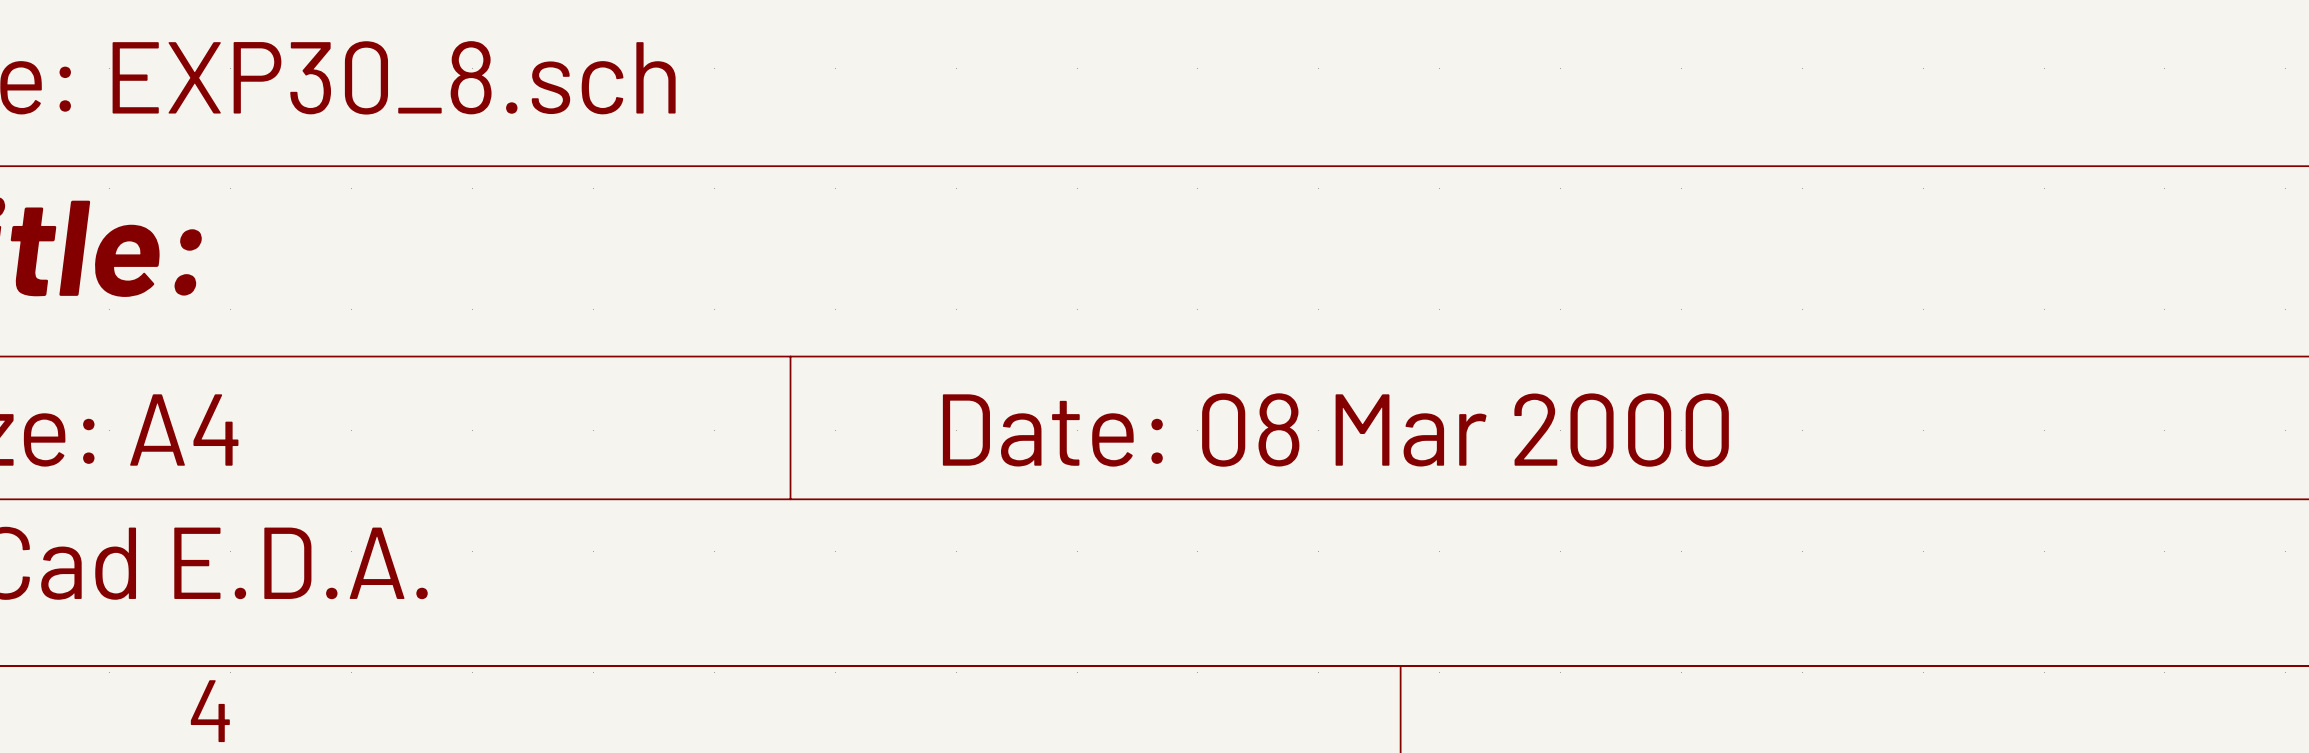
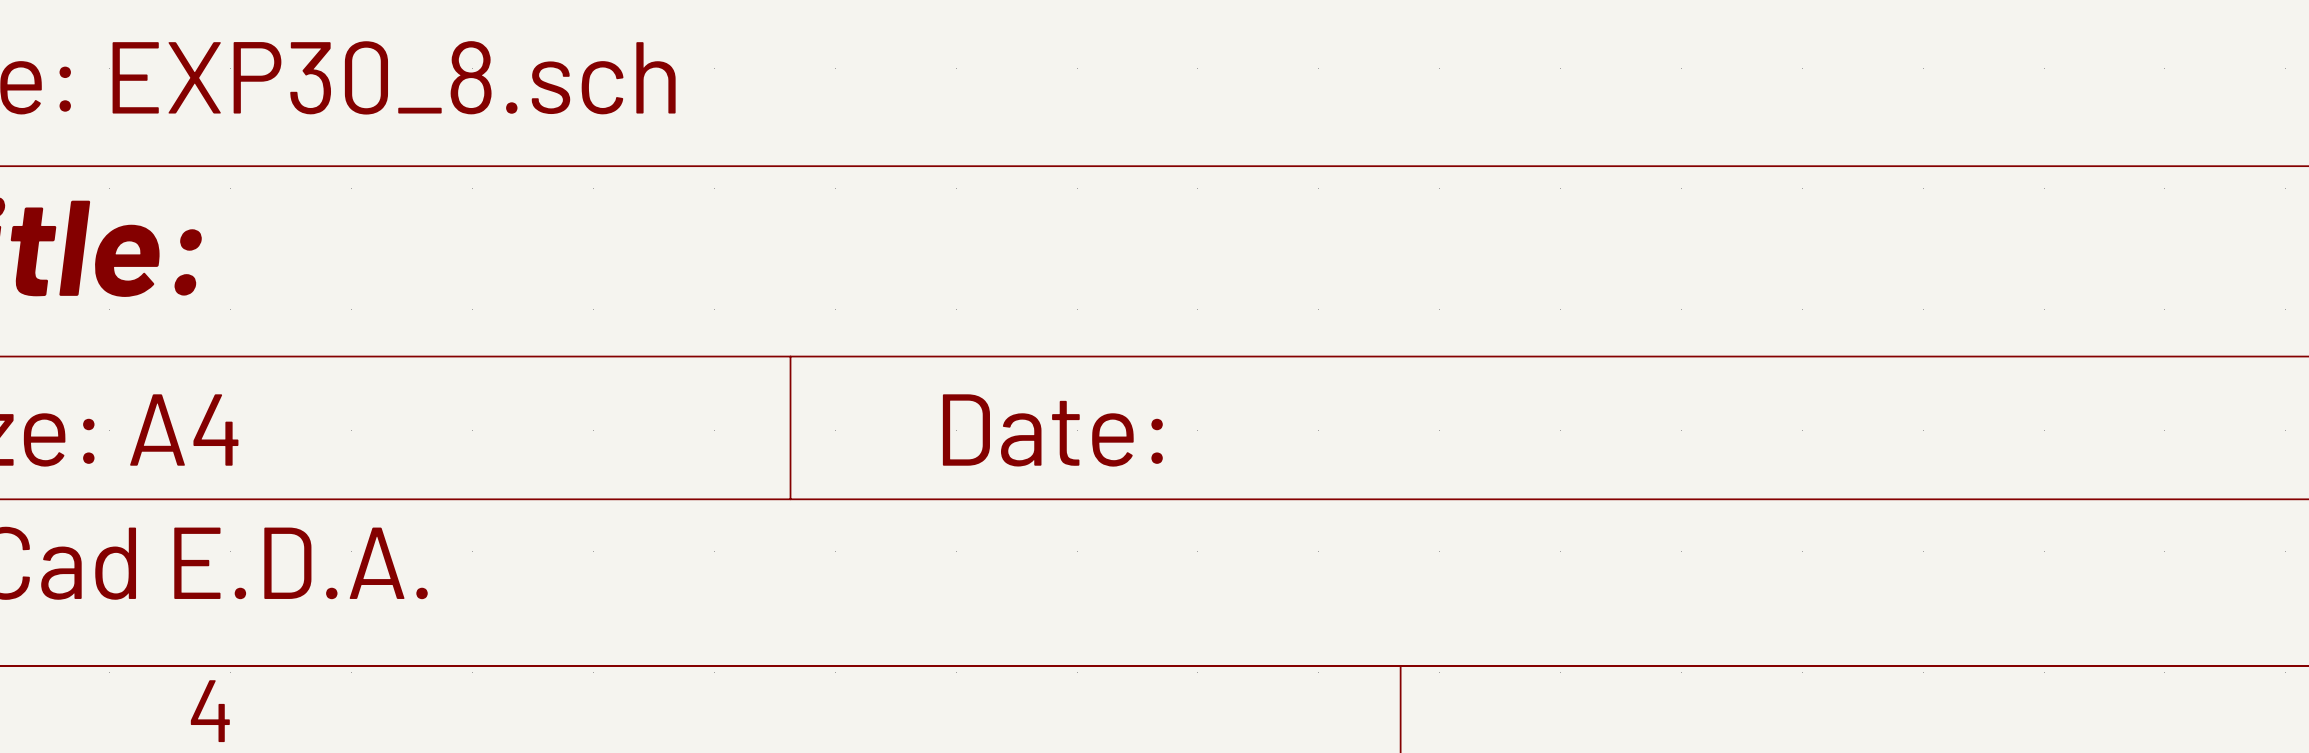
title block: Date: 08 Mar 2000 (1335, 430) -> Date: (1052, 430)

